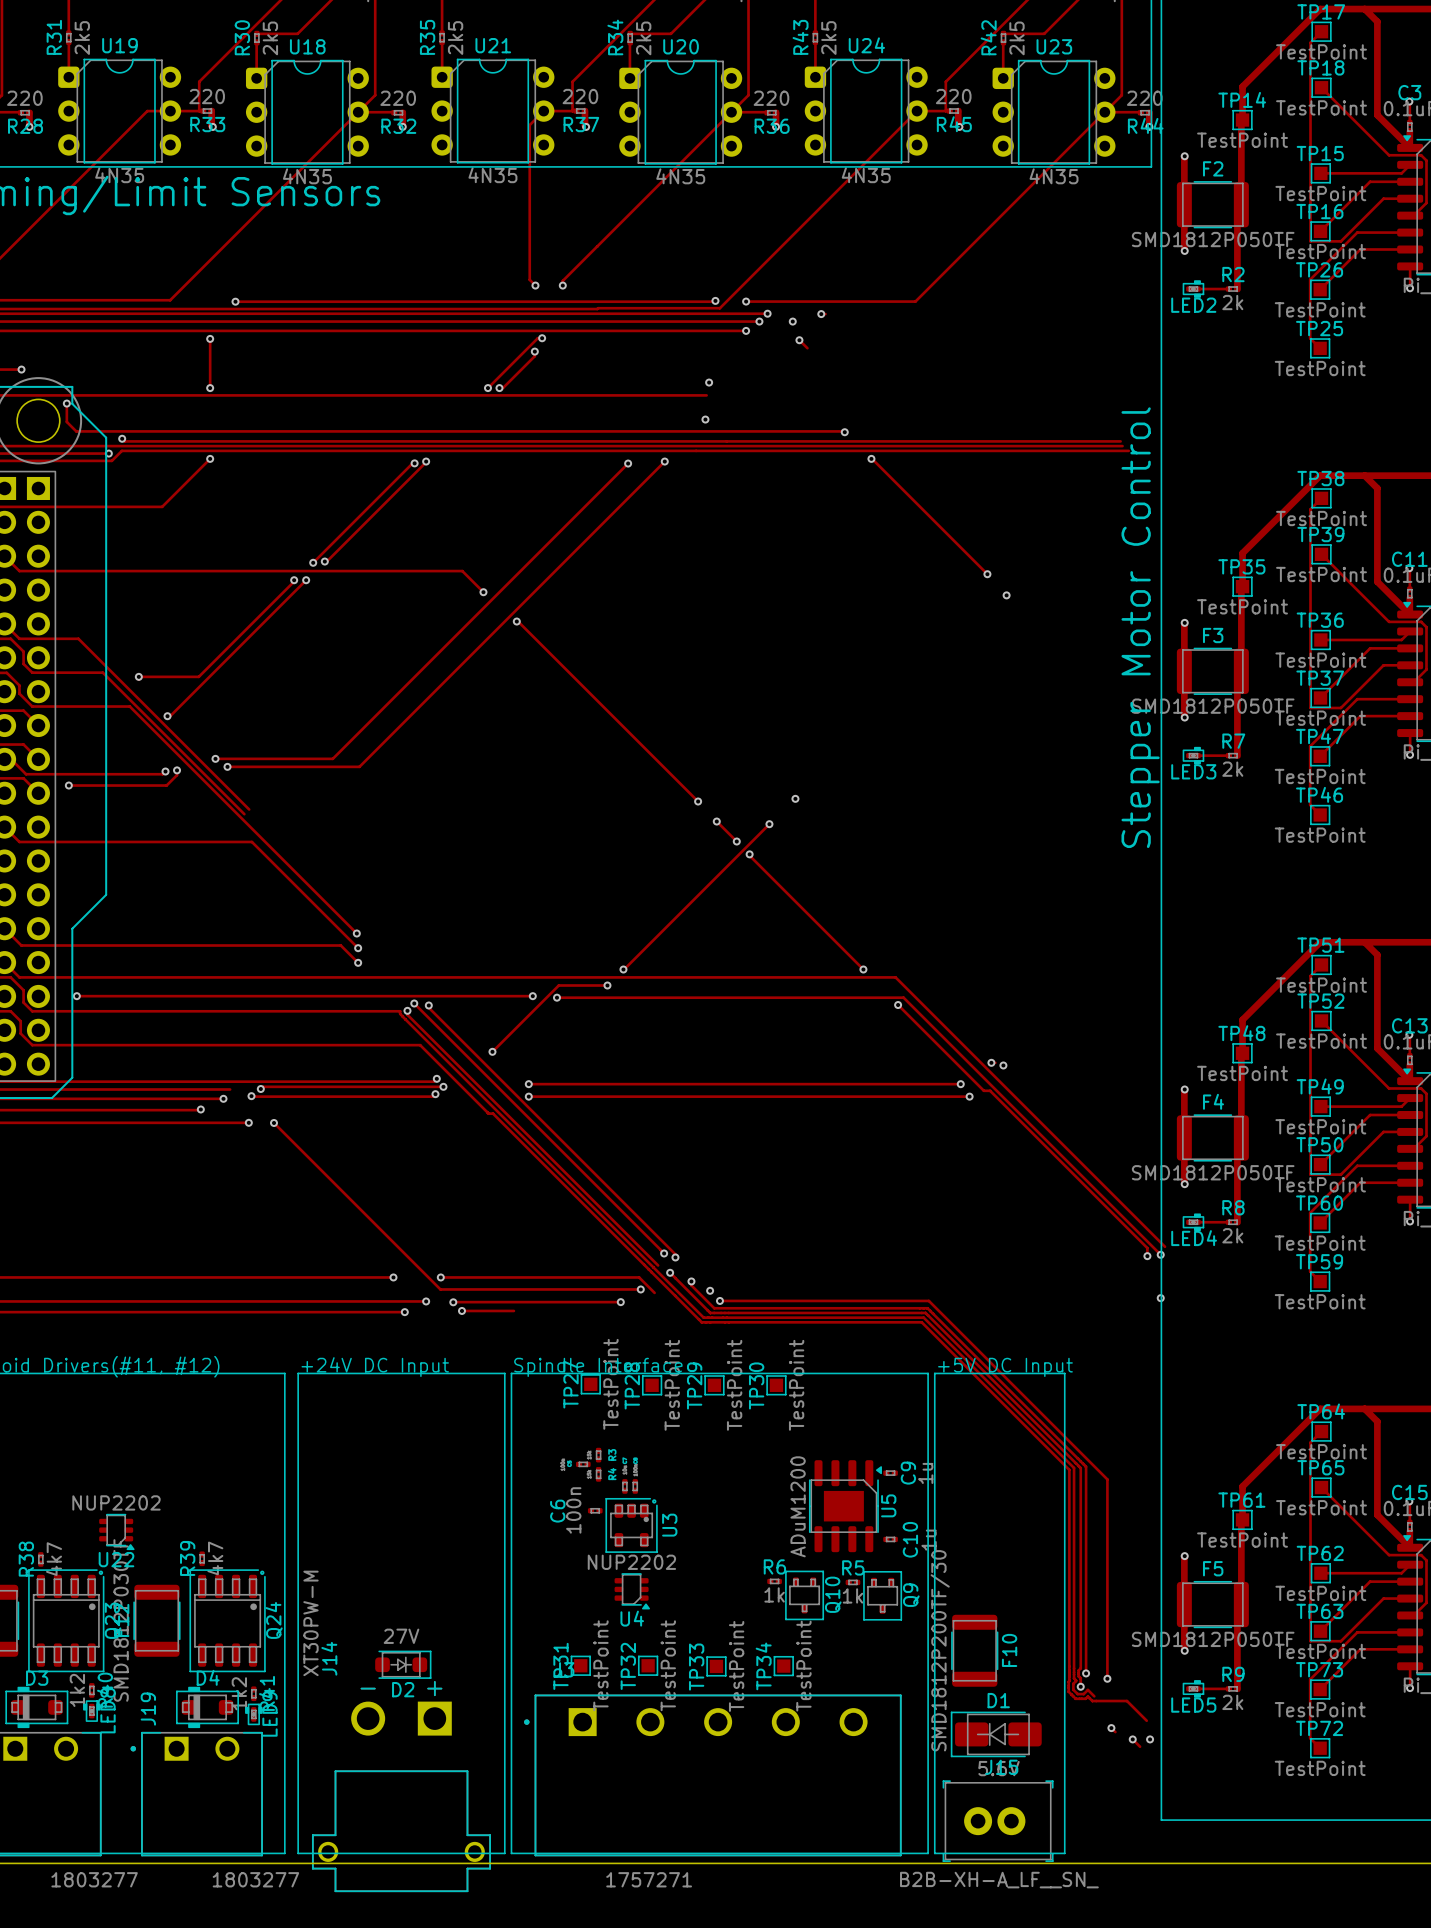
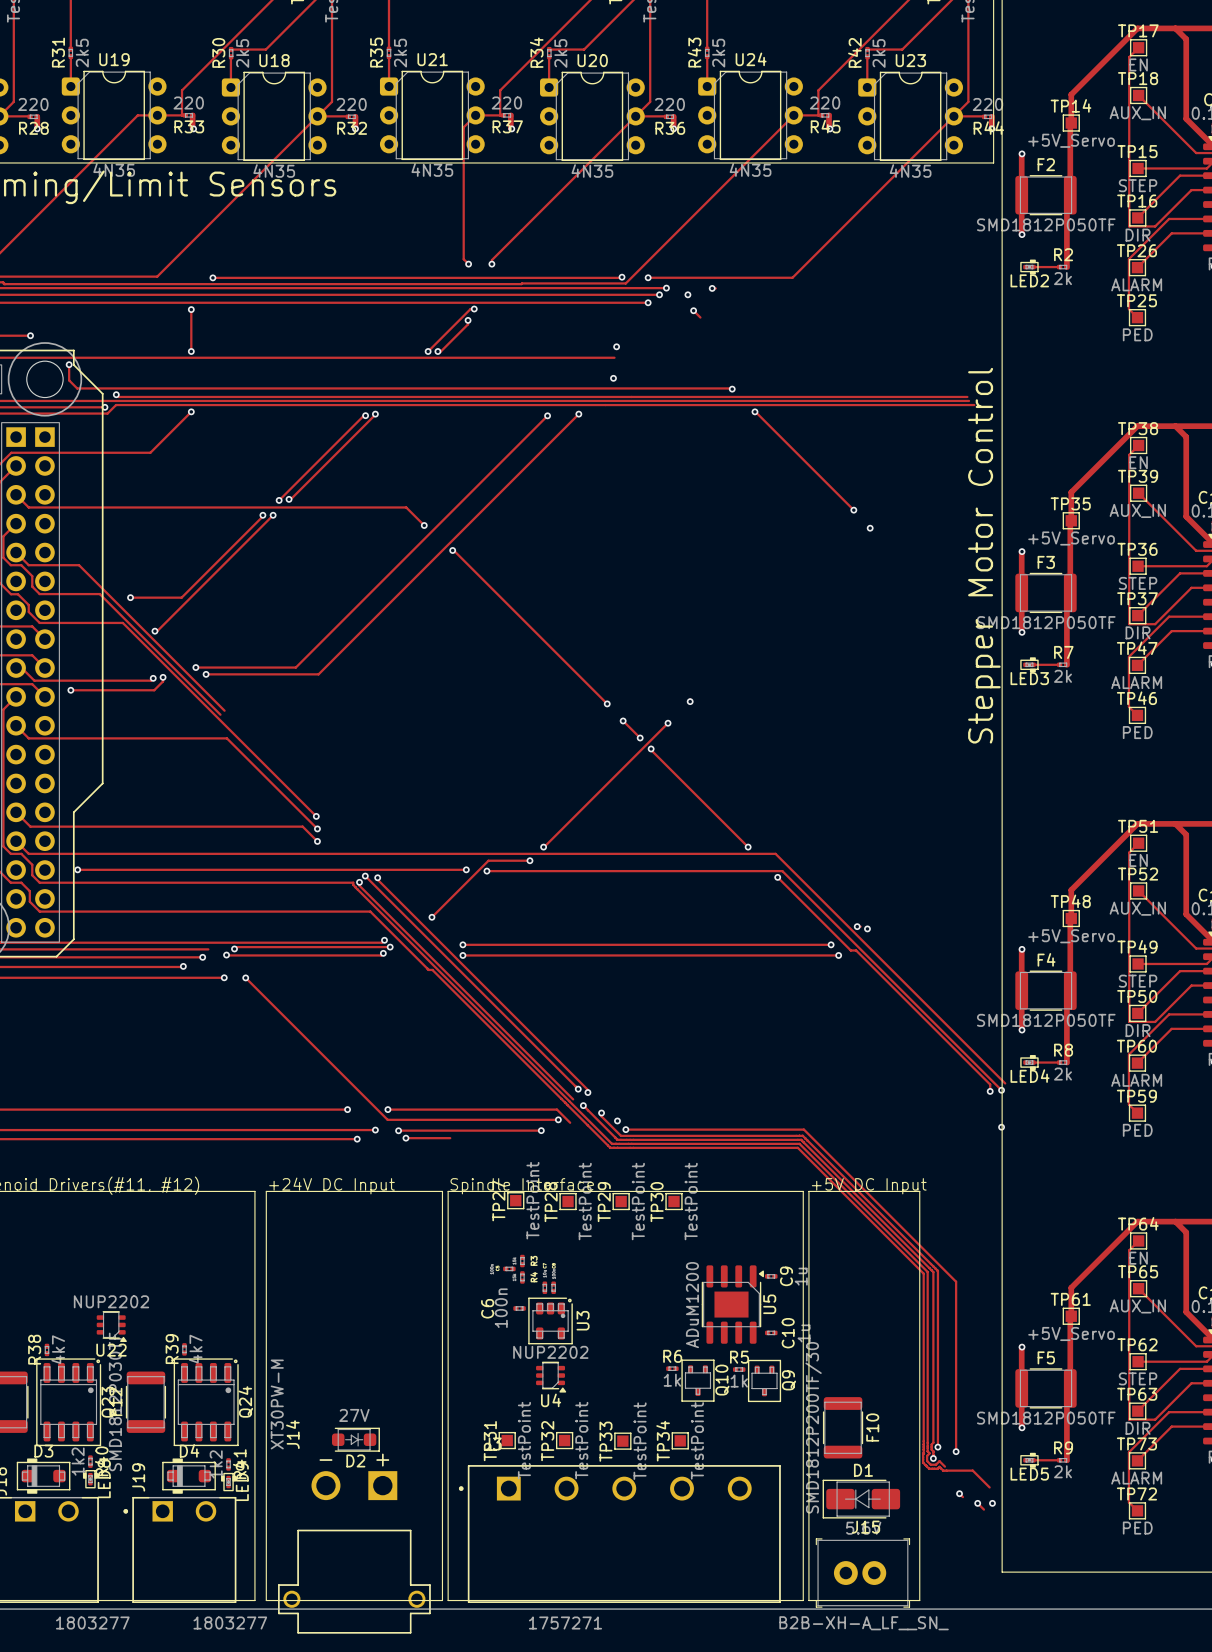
TP17 value: TestPoint (1321, 51) -> EN (1138, 64)
TP18 value: TestPoint (1321, 107) -> AUX_IN (1137, 113)
TP14 value: TestPoint (1242, 140) -> +5V_Servo (1071, 140)
TP15 value: TestPoint (1320, 193) -> STEP (1138, 185)
TP16 value: TestPoint (1320, 251) -> DIR (1138, 235)
TP26 value: TestPoint (1320, 309) -> ALARM (1136, 284)
TP25 value: TestPoint (1320, 368) -> PED (1137, 334)
TP38 value: TestPoint (1321, 518) -> EN (1138, 462)
TP39 value: TestPoint (1321, 574) -> AUX_IN (1137, 510)
TP35 value: TestPoint (1242, 606) -> +5V_Servo (1071, 538)
TP36 value: TestPoint (1320, 660) -> STEP (1138, 583)
TP37 value: TestPoint (1320, 718) -> DIR (1138, 632)
TP47 value: TestPoint (1320, 776) -> ALARM (1136, 682)
TP46 value: TestPoint (1320, 835) -> PED (1137, 732)
TP51 value: TestPoint (1321, 985) -> EN (1138, 860)
TP52 value: TestPoint (1321, 1041) -> AUX_IN (1137, 908)
TP48 value: TestPoint (1242, 1073) -> +5V_Servo (1071, 936)
TP49 value: TestPoint (1320, 1126) -> STEP (1138, 981)
TP50 value: TestPoint (1320, 1184) -> DIR (1138, 1030)
TP60 value: TestPoint (1320, 1243) -> ALARM (1136, 1080)
TP59 value: TestPoint (1320, 1301) -> PED (1137, 1130)
TP64 value: TestPoint (1321, 1451) -> EN (1138, 1258)
TP65 value: TestPoint (1321, 1507) -> AUX_IN (1137, 1306)
TP61 value: TestPoint (1242, 1540) -> +5V_Servo (1071, 1333)
TP62 value: TestPoint (1320, 1593) -> STEP (1138, 1378)
TP63 value: TestPoint (1320, 1651) -> DIR (1138, 1428)
TP73 value: TestPoint (1320, 1709) -> ALARM (1136, 1478)
TP72 value: TestPoint (1320, 1768) -> PED (1137, 1528)

